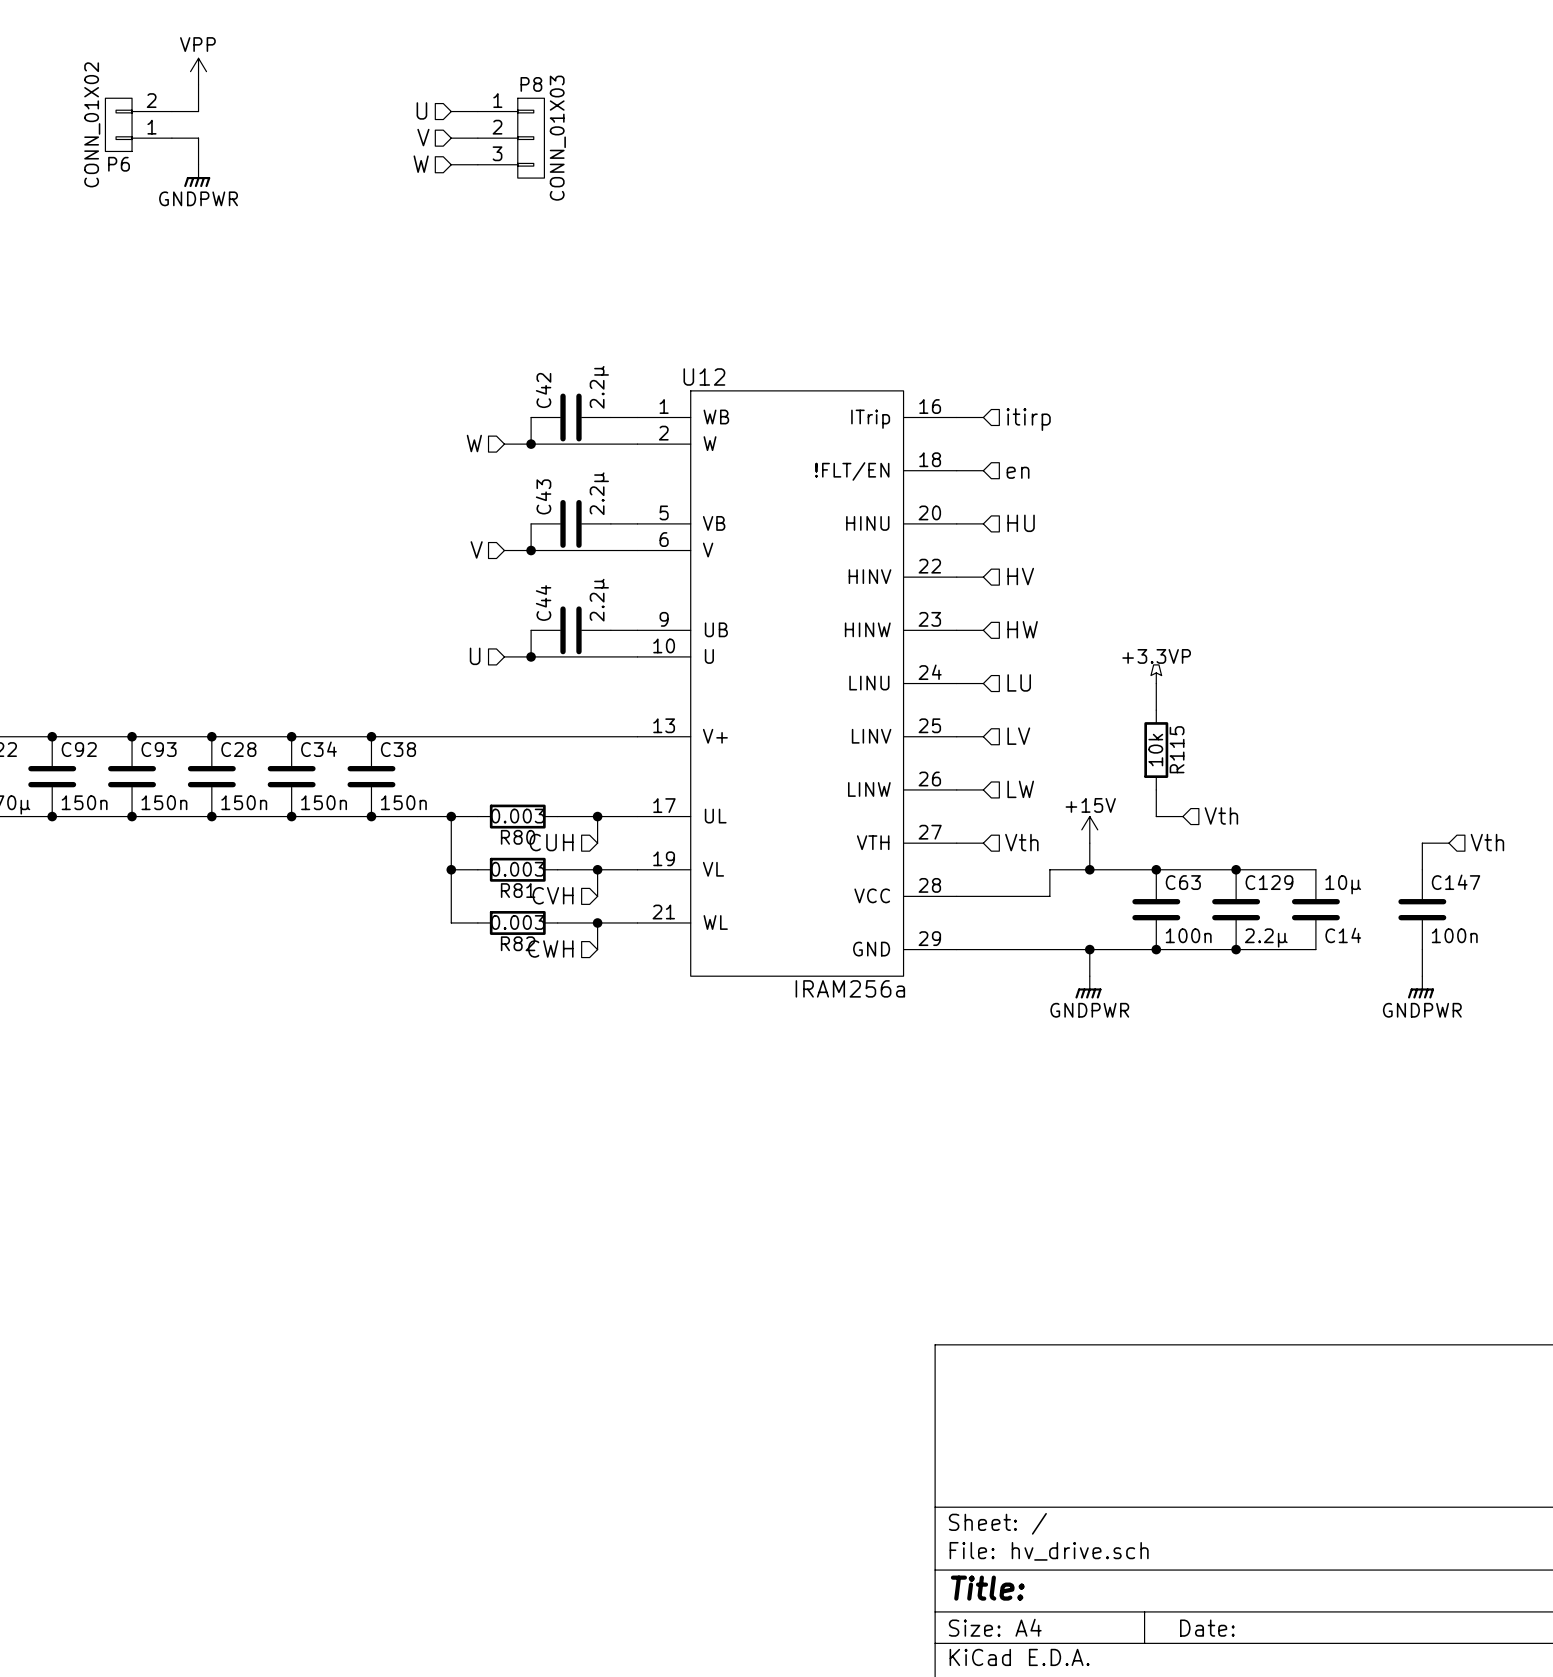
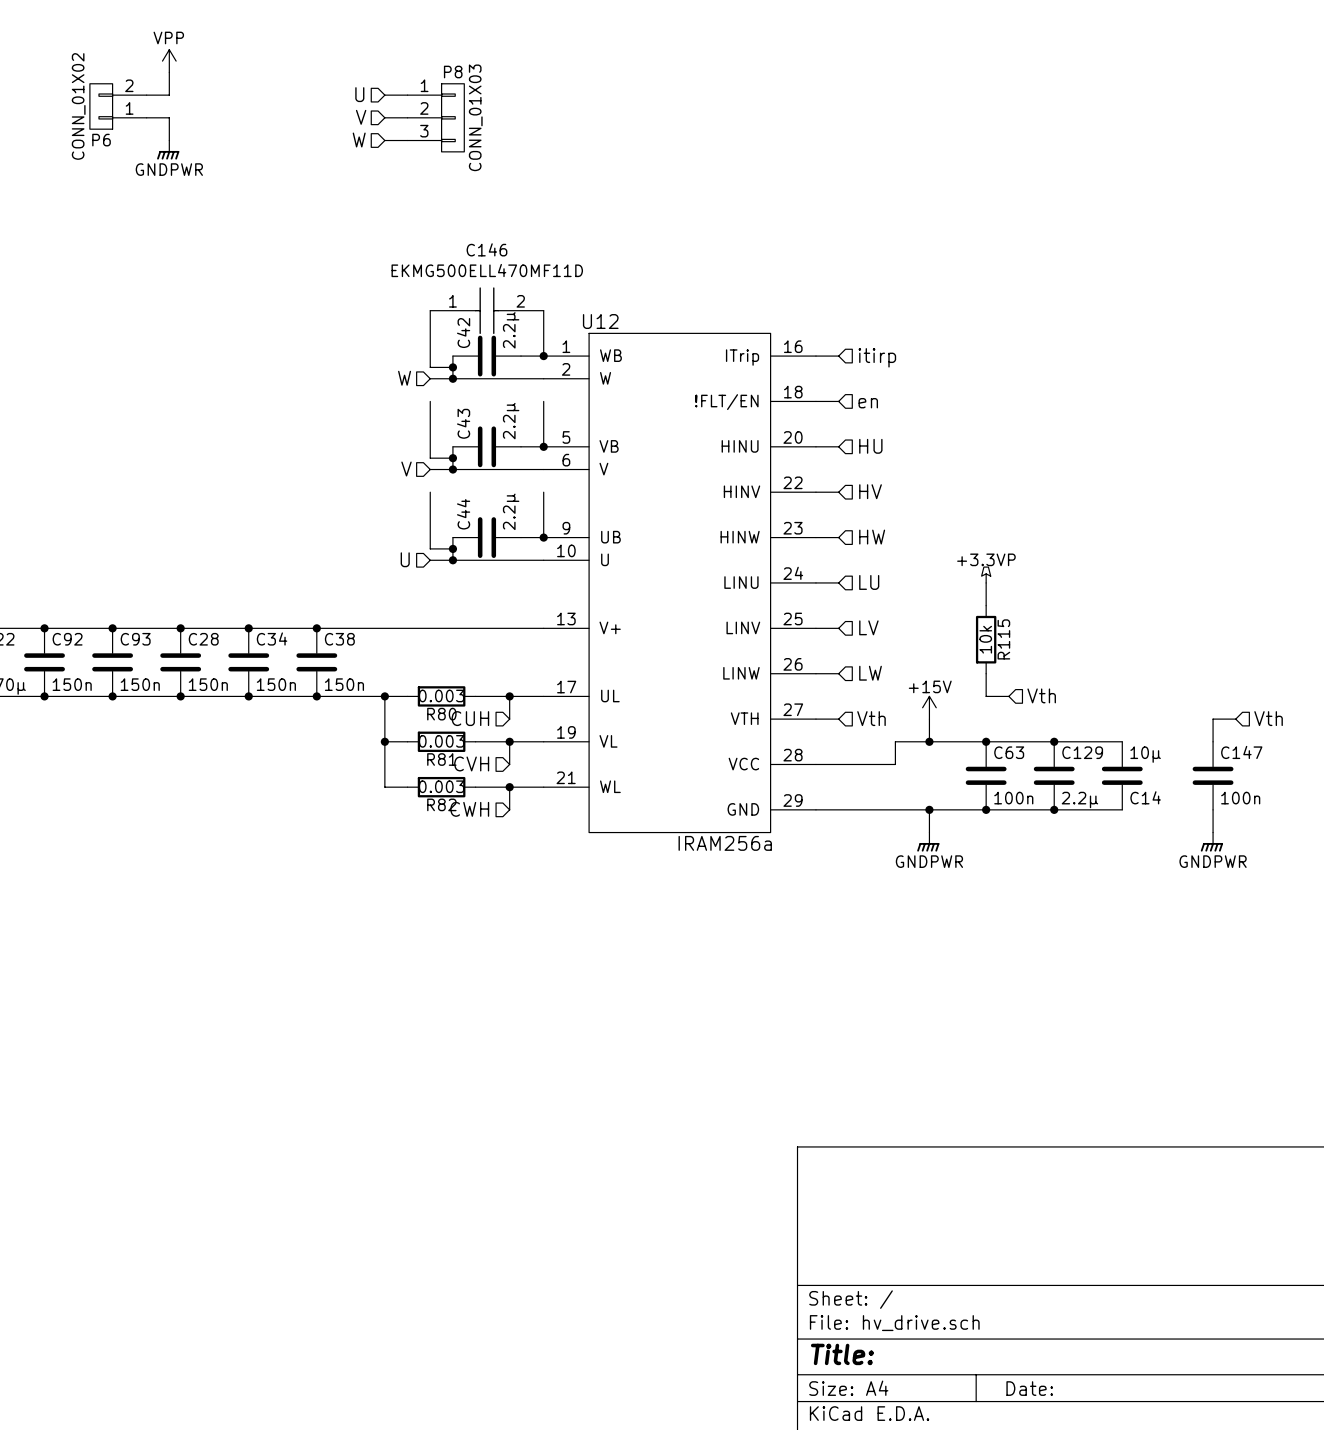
wire: none -> (430, 310) (430, 367) (452, 367)
C146: none -> EKMG500ELL470MF11D (486, 310)
wire: none -> (543, 310) (543, 356)
junction: none -> (543, 356)
junction: none -> (452, 367)
wire: none -> (430, 401) (430, 458) (452, 458)
wire: none -> (543, 401) (543, 446)
junction: none -> (543, 446)
junction: none -> (452, 458)
wire: none -> (430, 492) (430, 548) (452, 548)
wire: none -> (543, 492) (543, 537)
junction: none -> (543, 537)
junction: none -> (452, 548)

